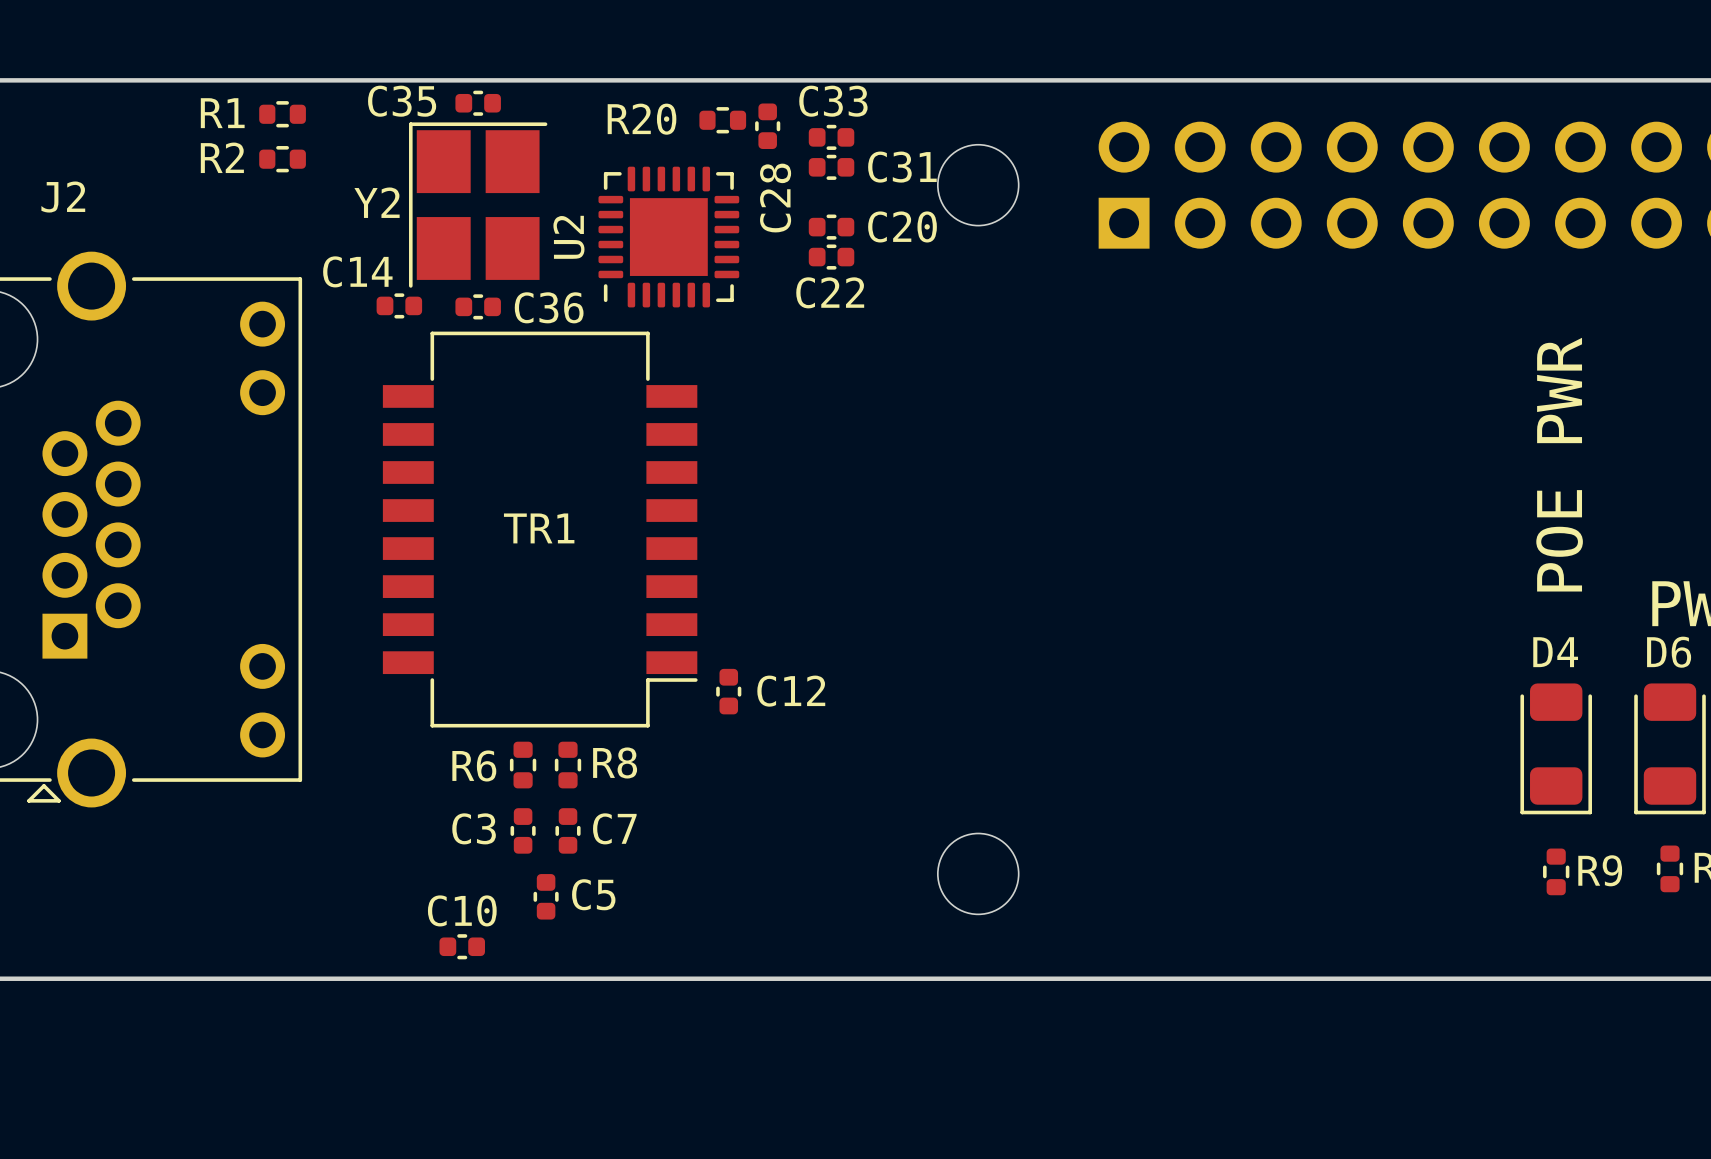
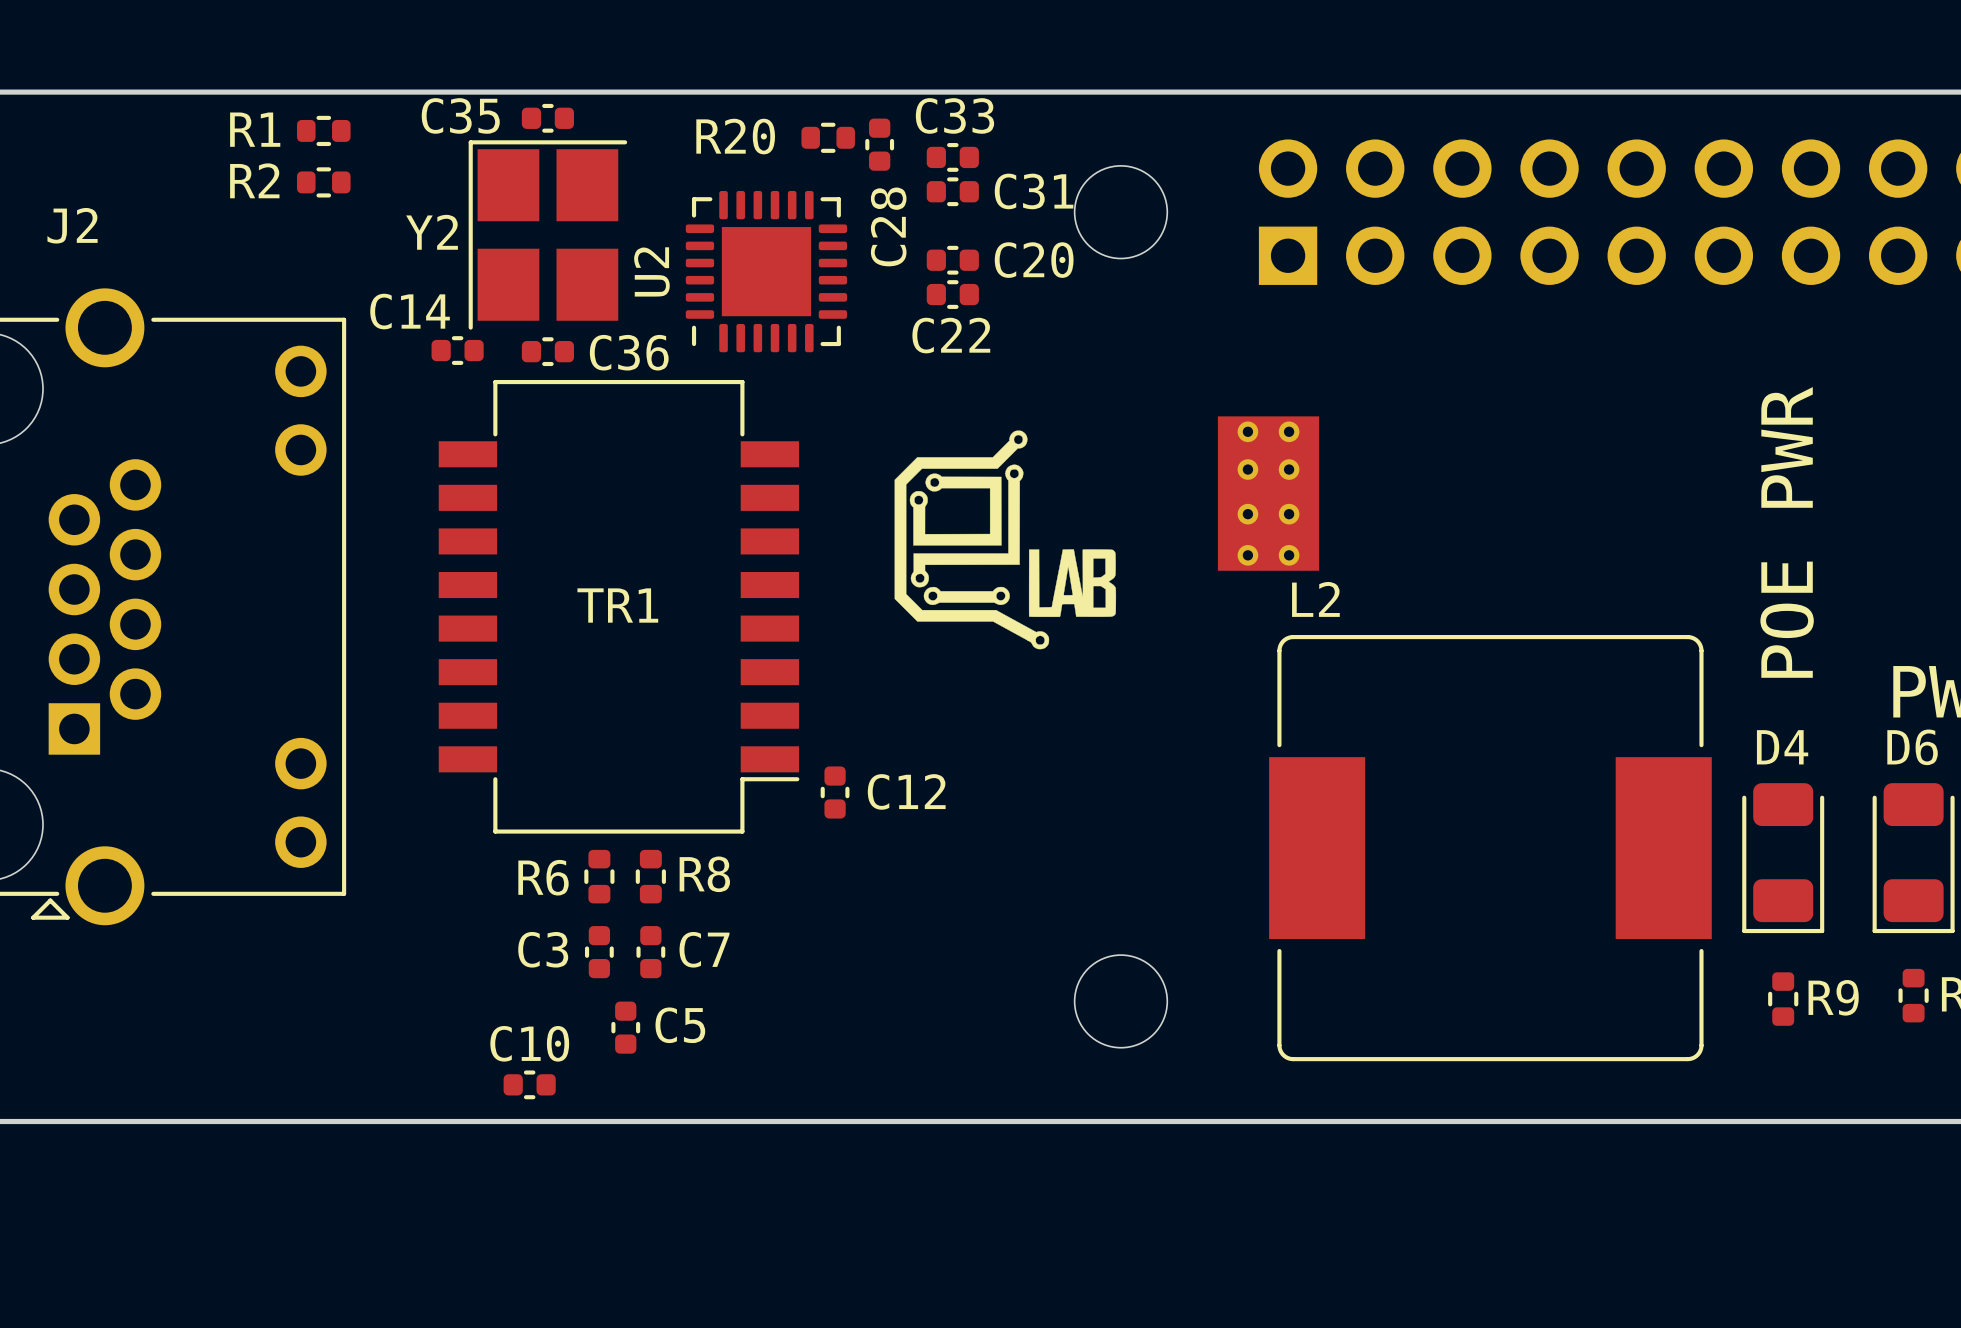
drawing: none -> [894, 430, 1117, 650]
part: none -> (1268, 493)
L2: none -> (1490, 848)

